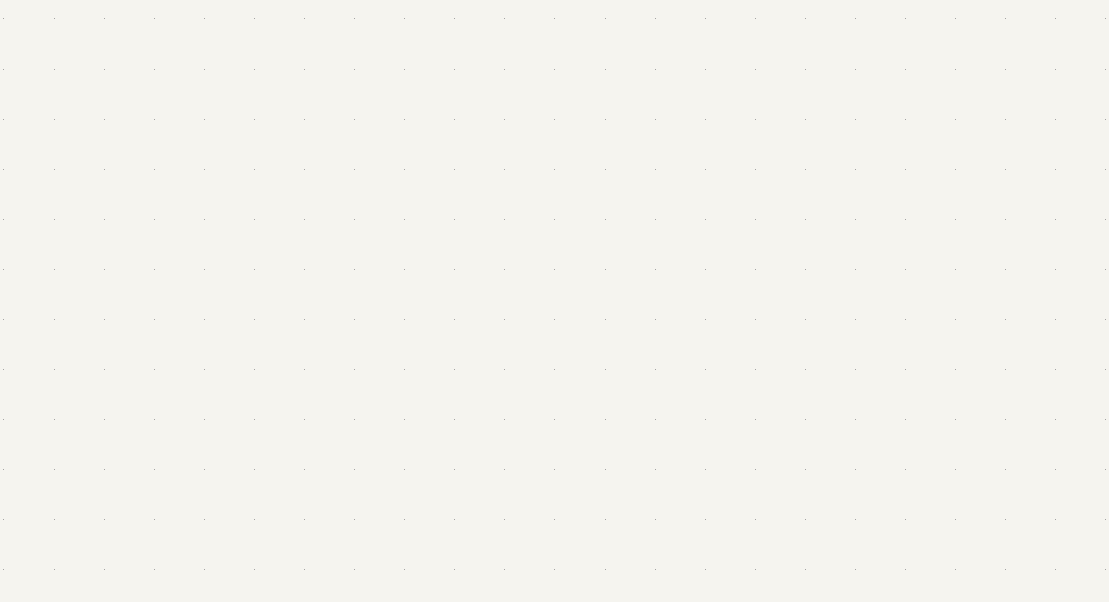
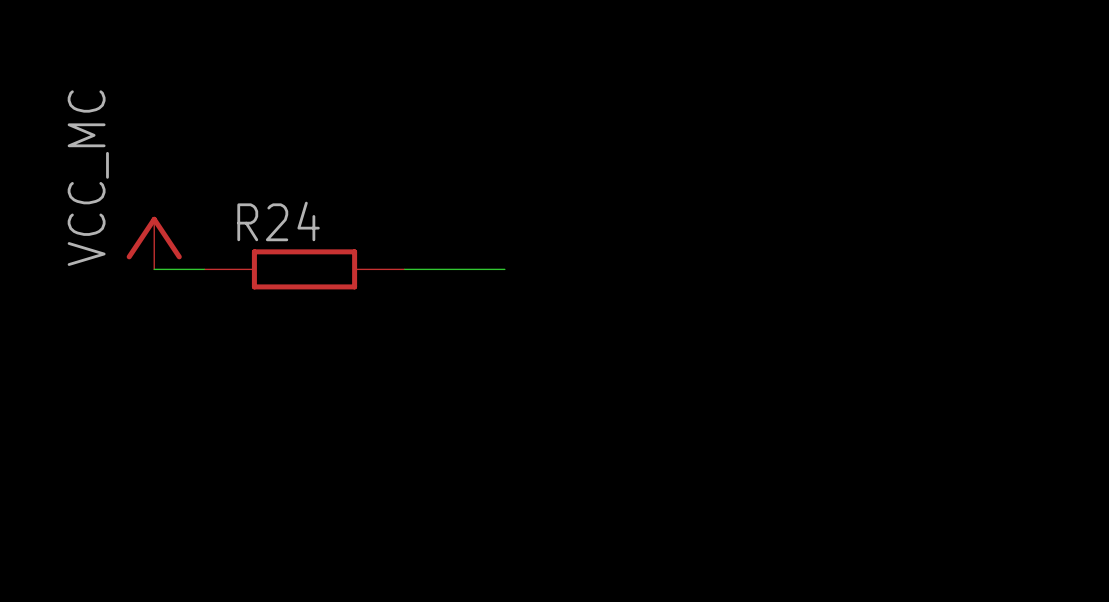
power symbol: none -> VCC_MC (154, 243)
wire: none -> (154, 269) (204, 269)
R24: none -> (304, 269)
wire: none -> (404, 269) (504, 269)

